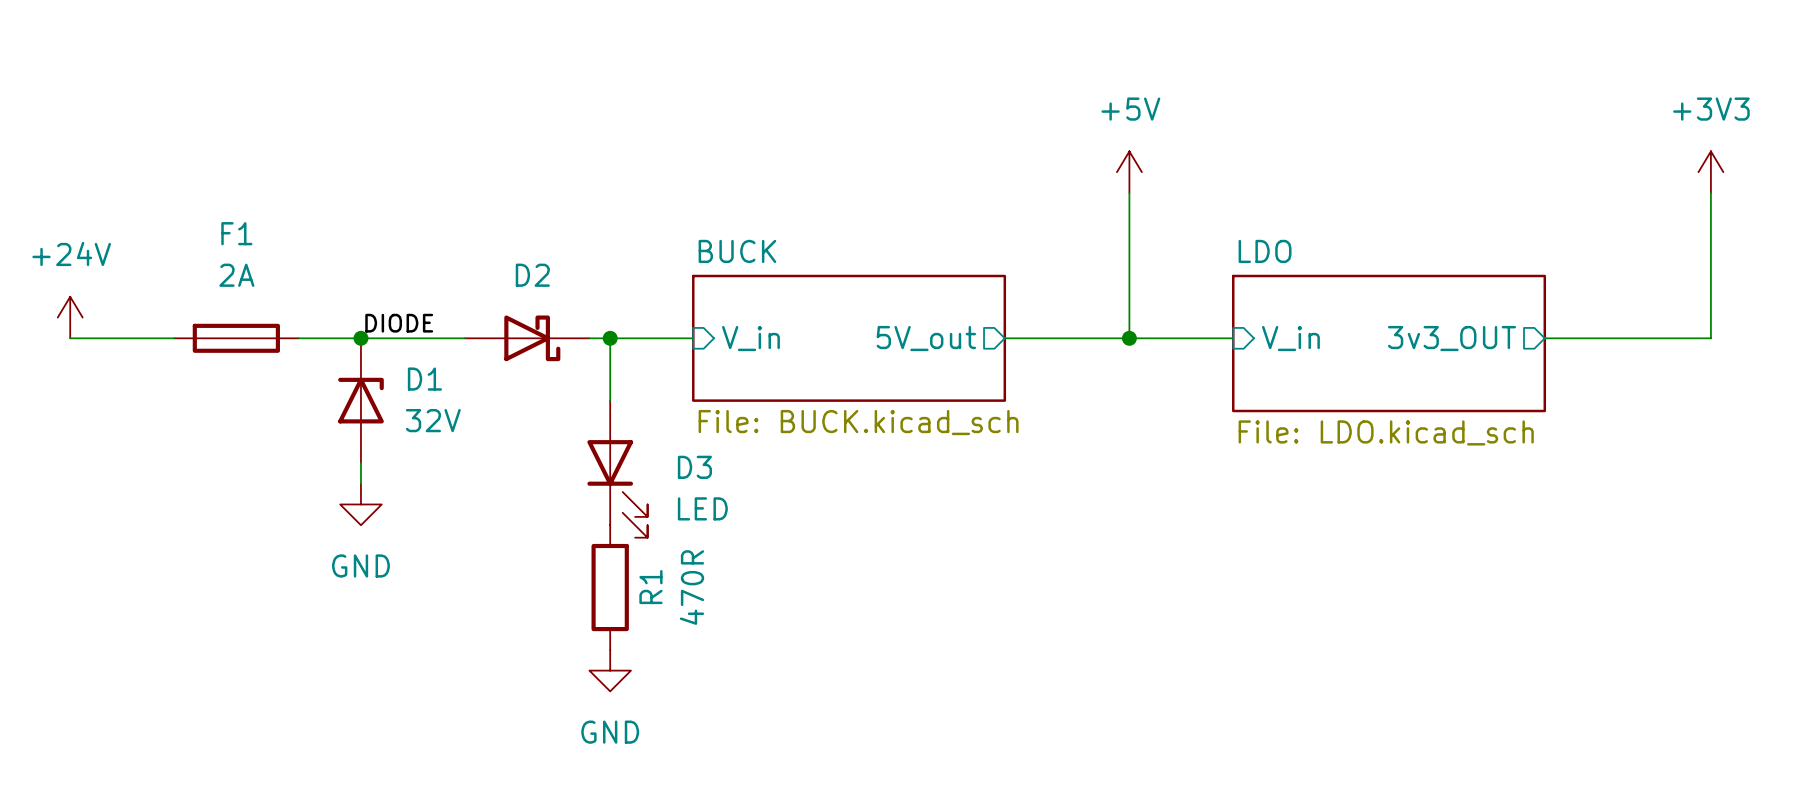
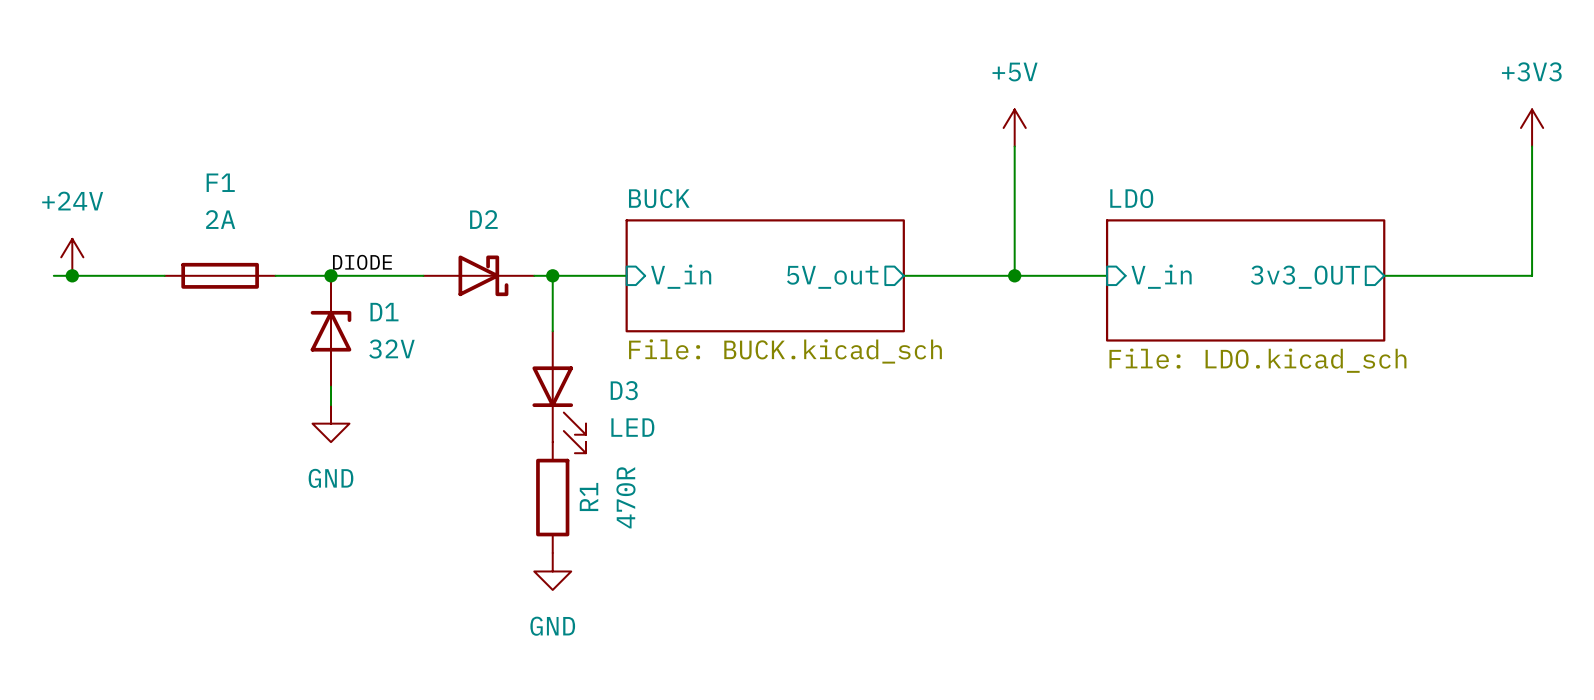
wire: none -> (53, 275) (72, 275)
junction: none -> (72, 275)

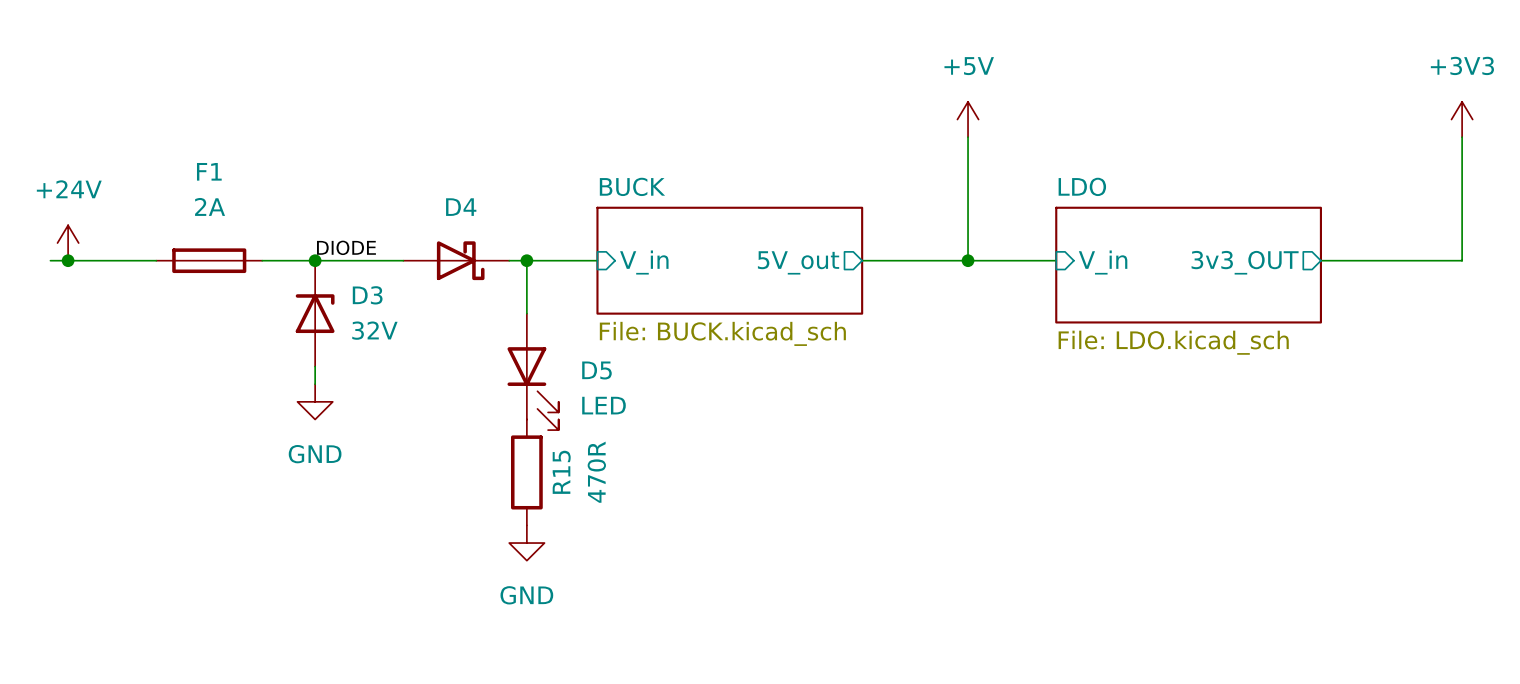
D2 name: D2 (483, 219) -> D4 (461, 207)
D1 name: D1 (384, 312) -> D3 (367, 295)
D3 name: D3 (624, 390) -> D5 (596, 370)
R1 name: R1 (589, 496) -> R15 (561, 472)

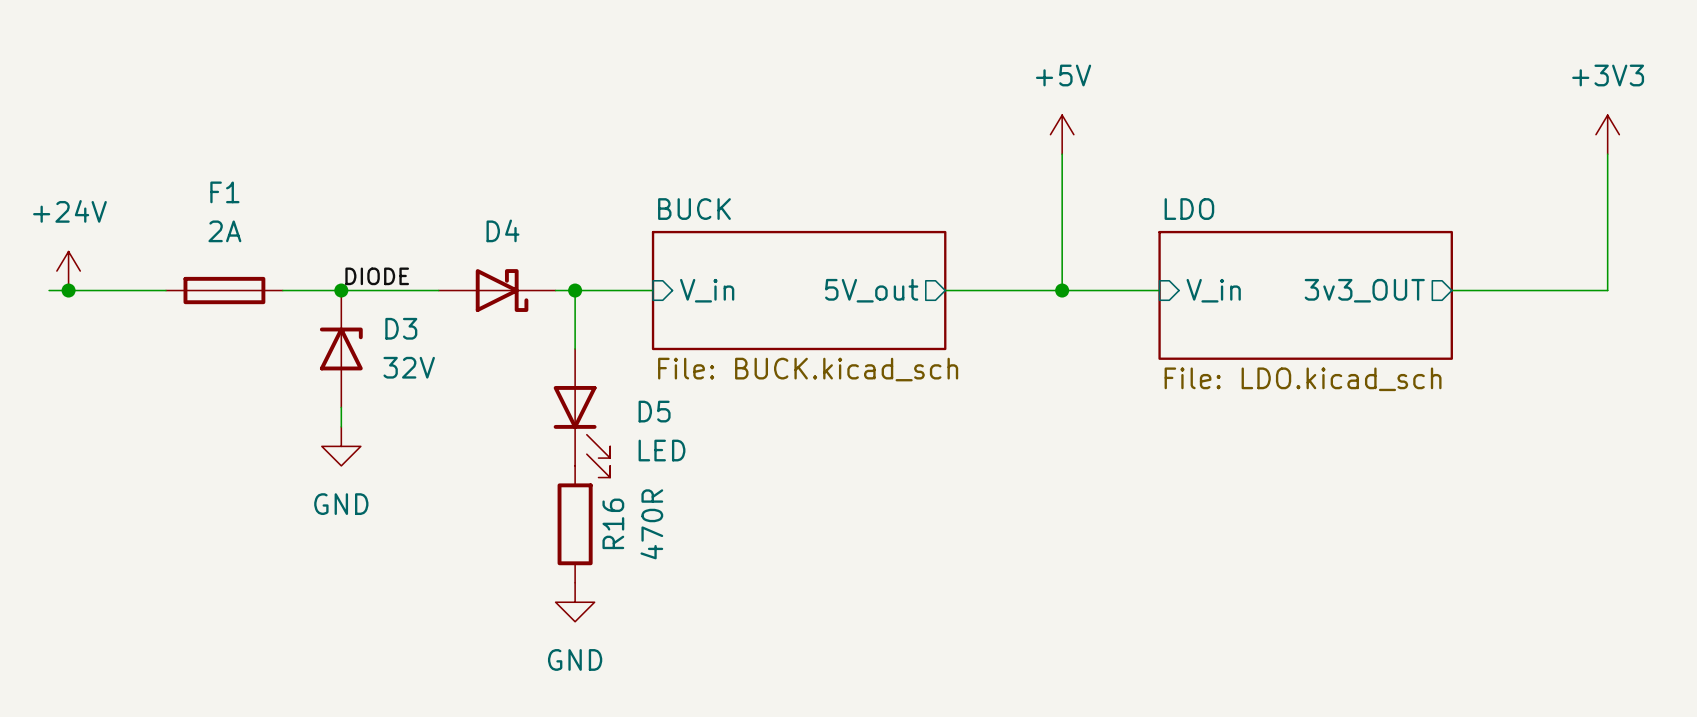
R15 name: R15 (561, 472) -> R16 (613, 523)

